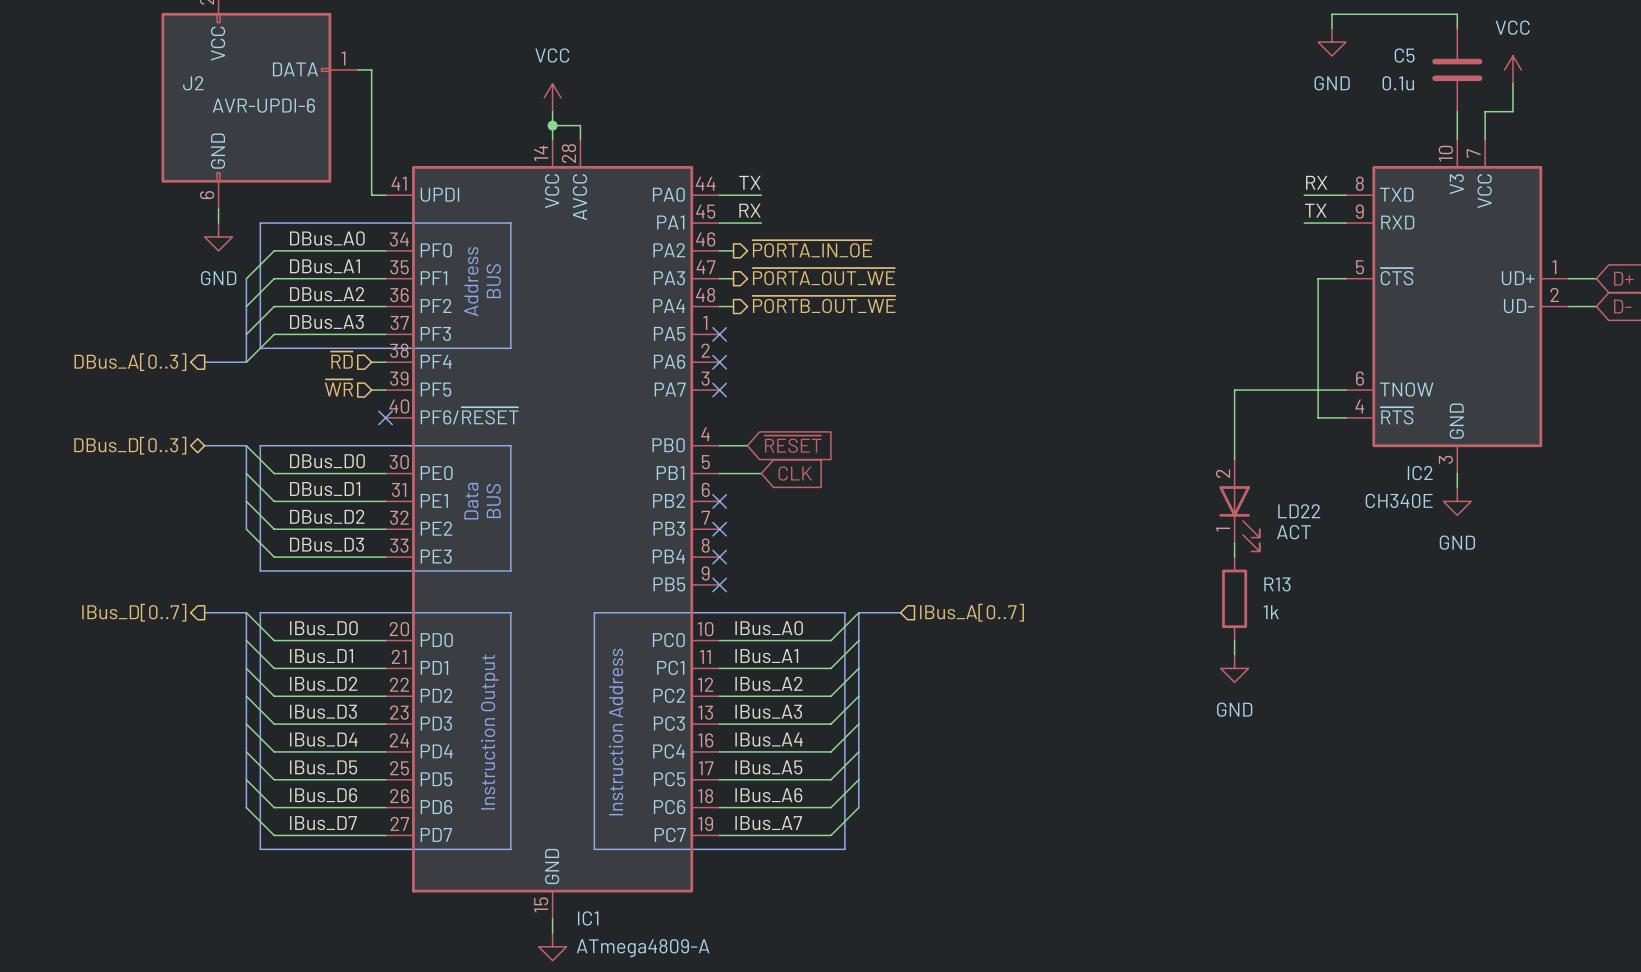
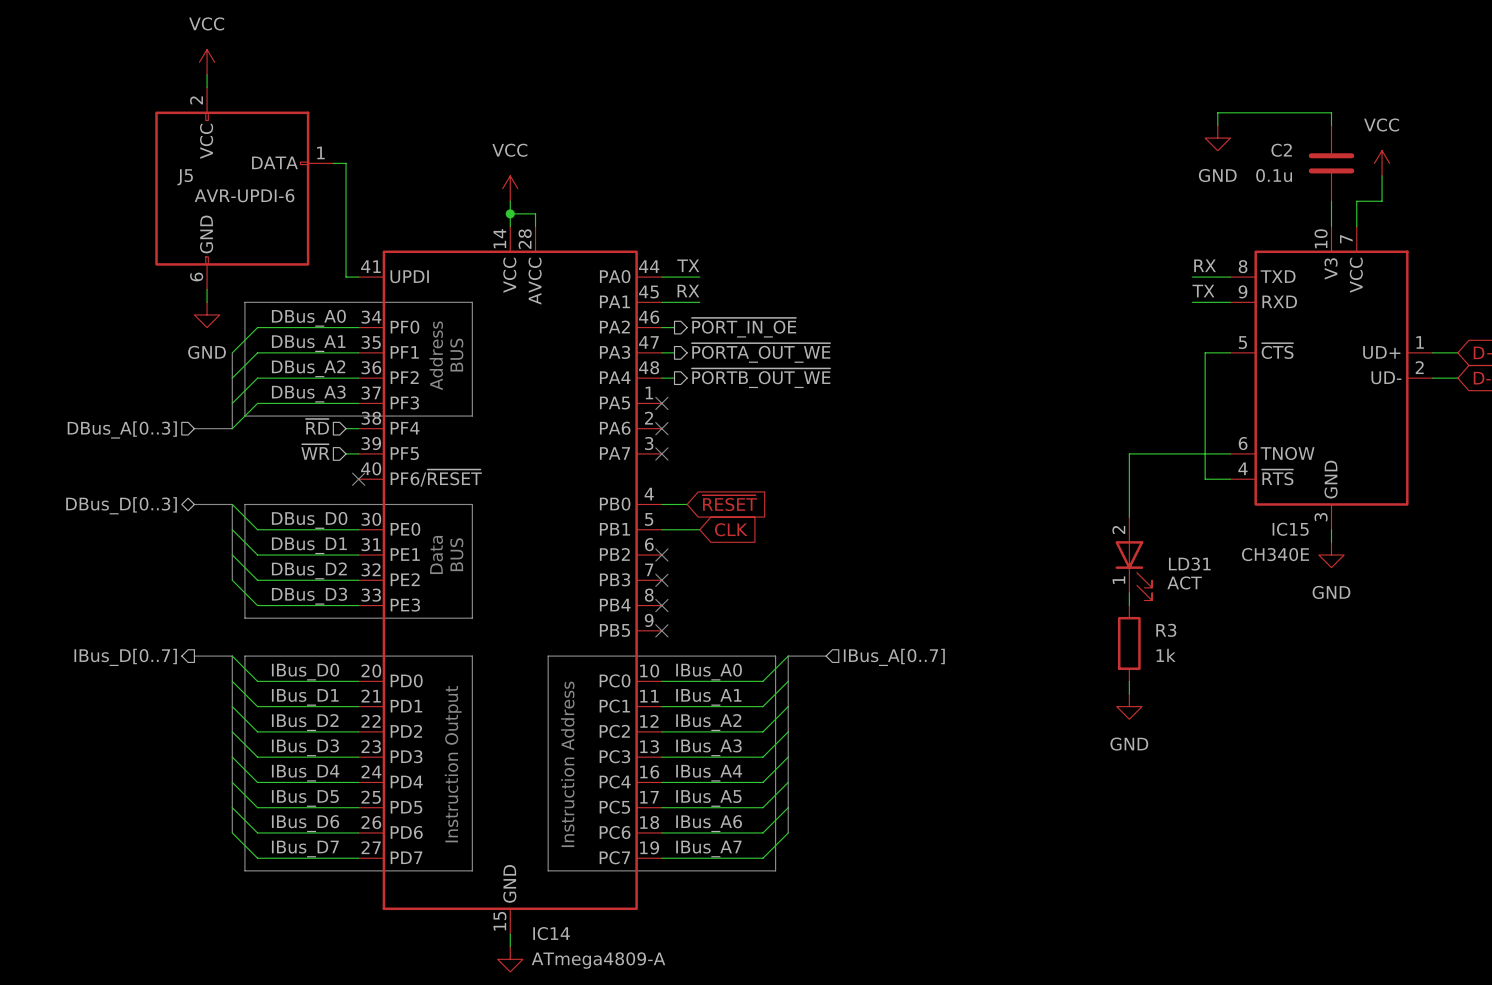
C5 name: C5 (1404, 55) -> C2 (1281, 150)
J2 name: J2 (193, 83) -> J5 (185, 177)
hierarchical label: ~{PORTA_IN_OE} (812, 248) -> ~{PORT_IN_OE} (743, 327)
hierarchical label shape: output (130, 362) -> input (122, 429)
IC2 name: IC2 (1420, 473) -> IC15 (1290, 529)
LD22 name: LD22 (1299, 511) -> LD31 (1189, 564)
R13 name: R13 (1277, 584) -> R3 (1166, 630)
IC1 name: IC1 (588, 918) -> IC14 (551, 933)

